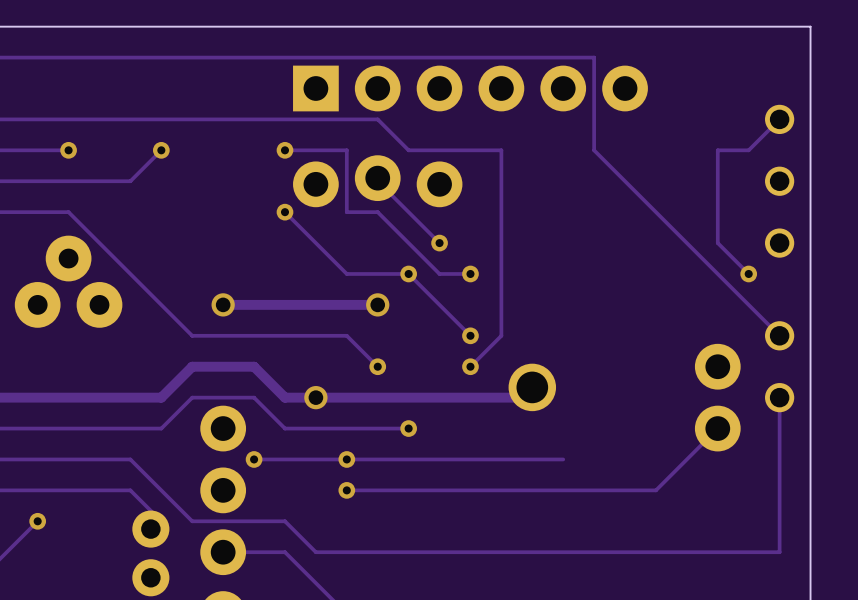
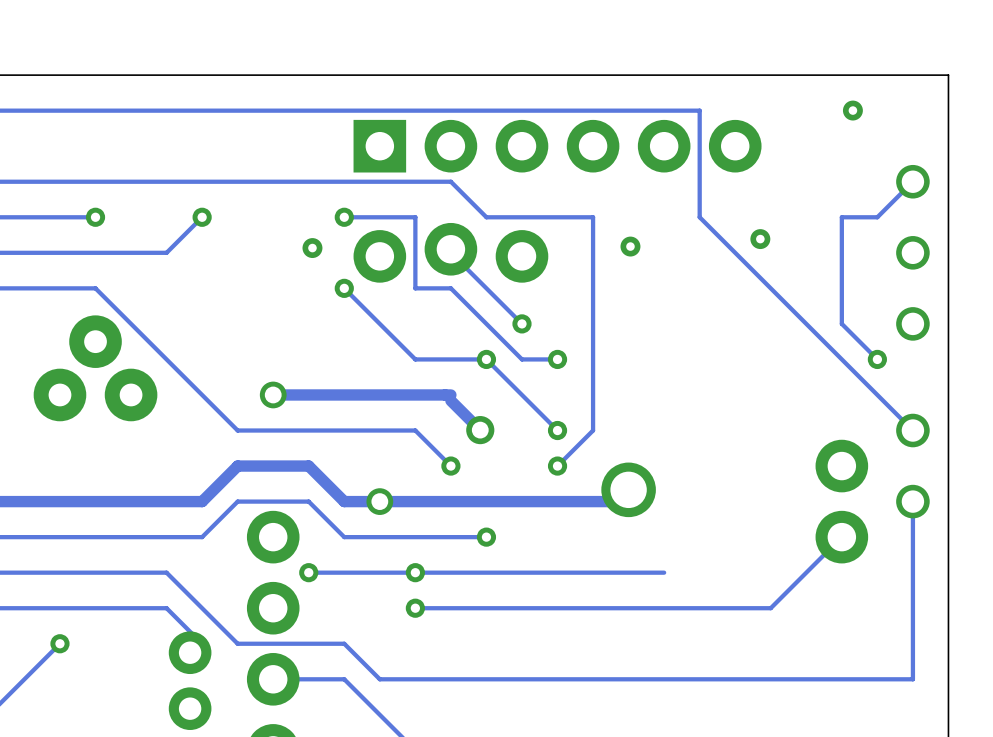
via: none -> (852, 110)
via: none -> (760, 239)
via: none -> (630, 246)
via: none -> (312, 248)
via: (377, 304) -> none
track: none -> (450, 400) (480, 430)
via: none -> (480, 430)

